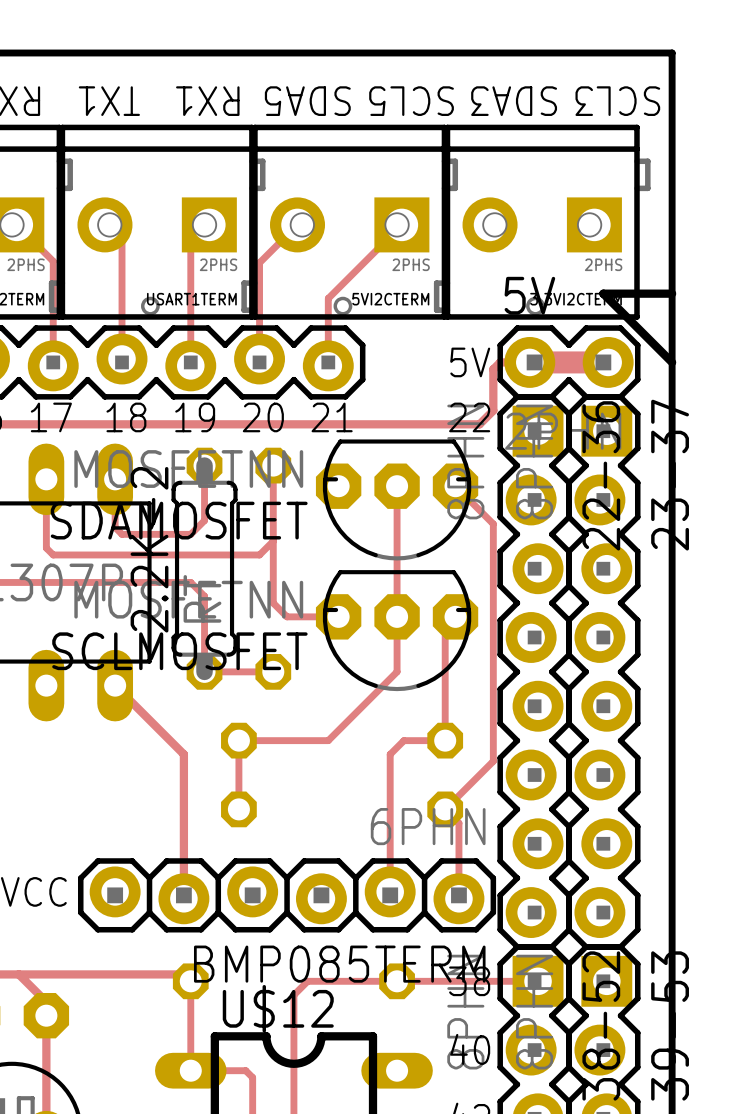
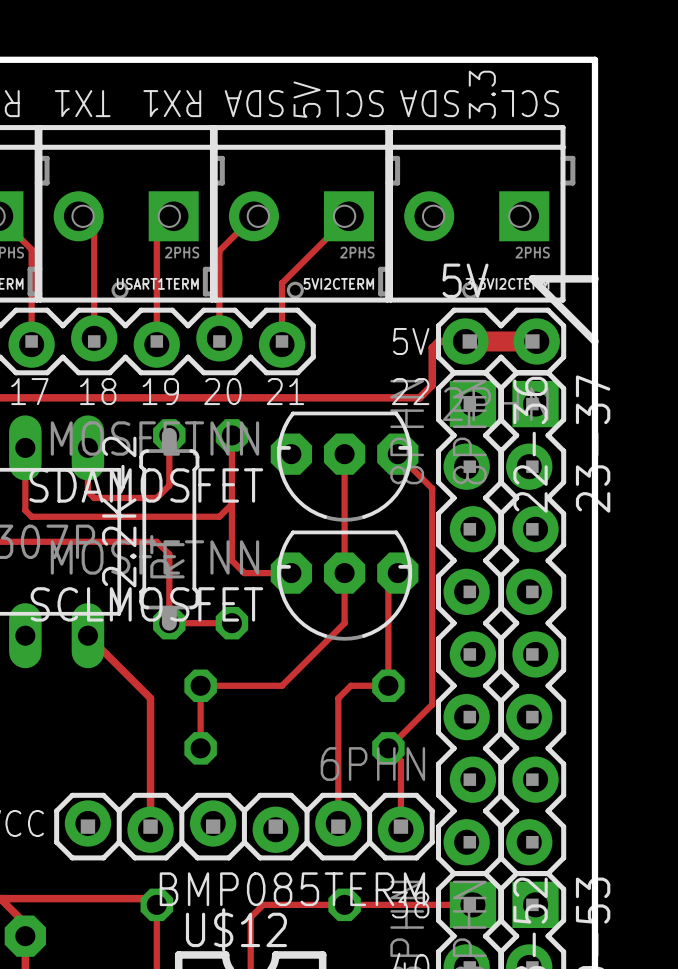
text: none -> 3.3 (482, 94)
text: none -> 5V (307, 99)
text: SDA5 (307, 101) -> SDA (254, 103)
text: SCL5 (411, 101) -> SCL (354, 103)
text: SDA3 (514, 101) -> SDA (429, 103)
text: SCL3 (617, 101) -> SCL (530, 103)

